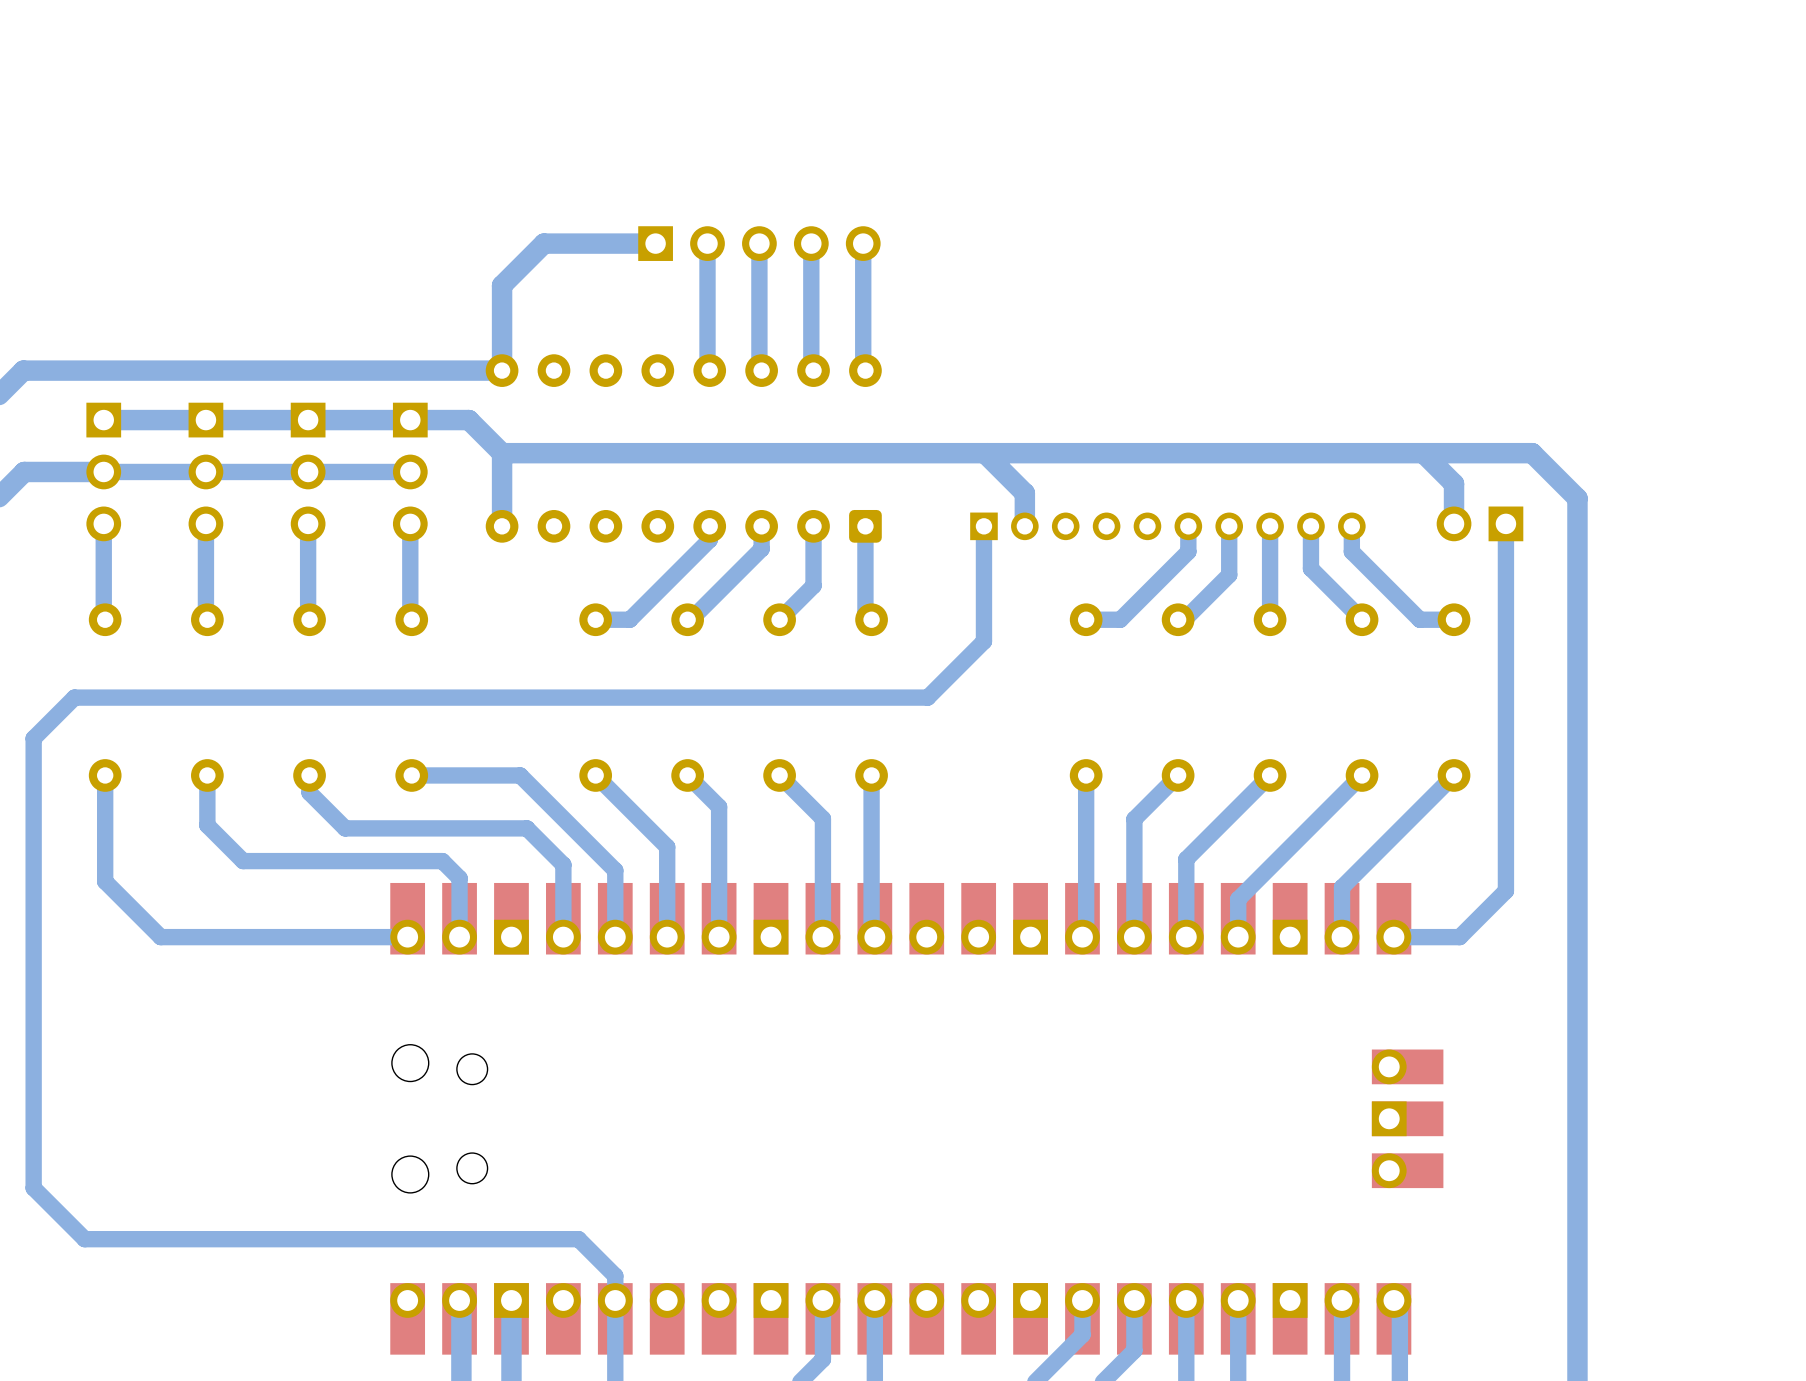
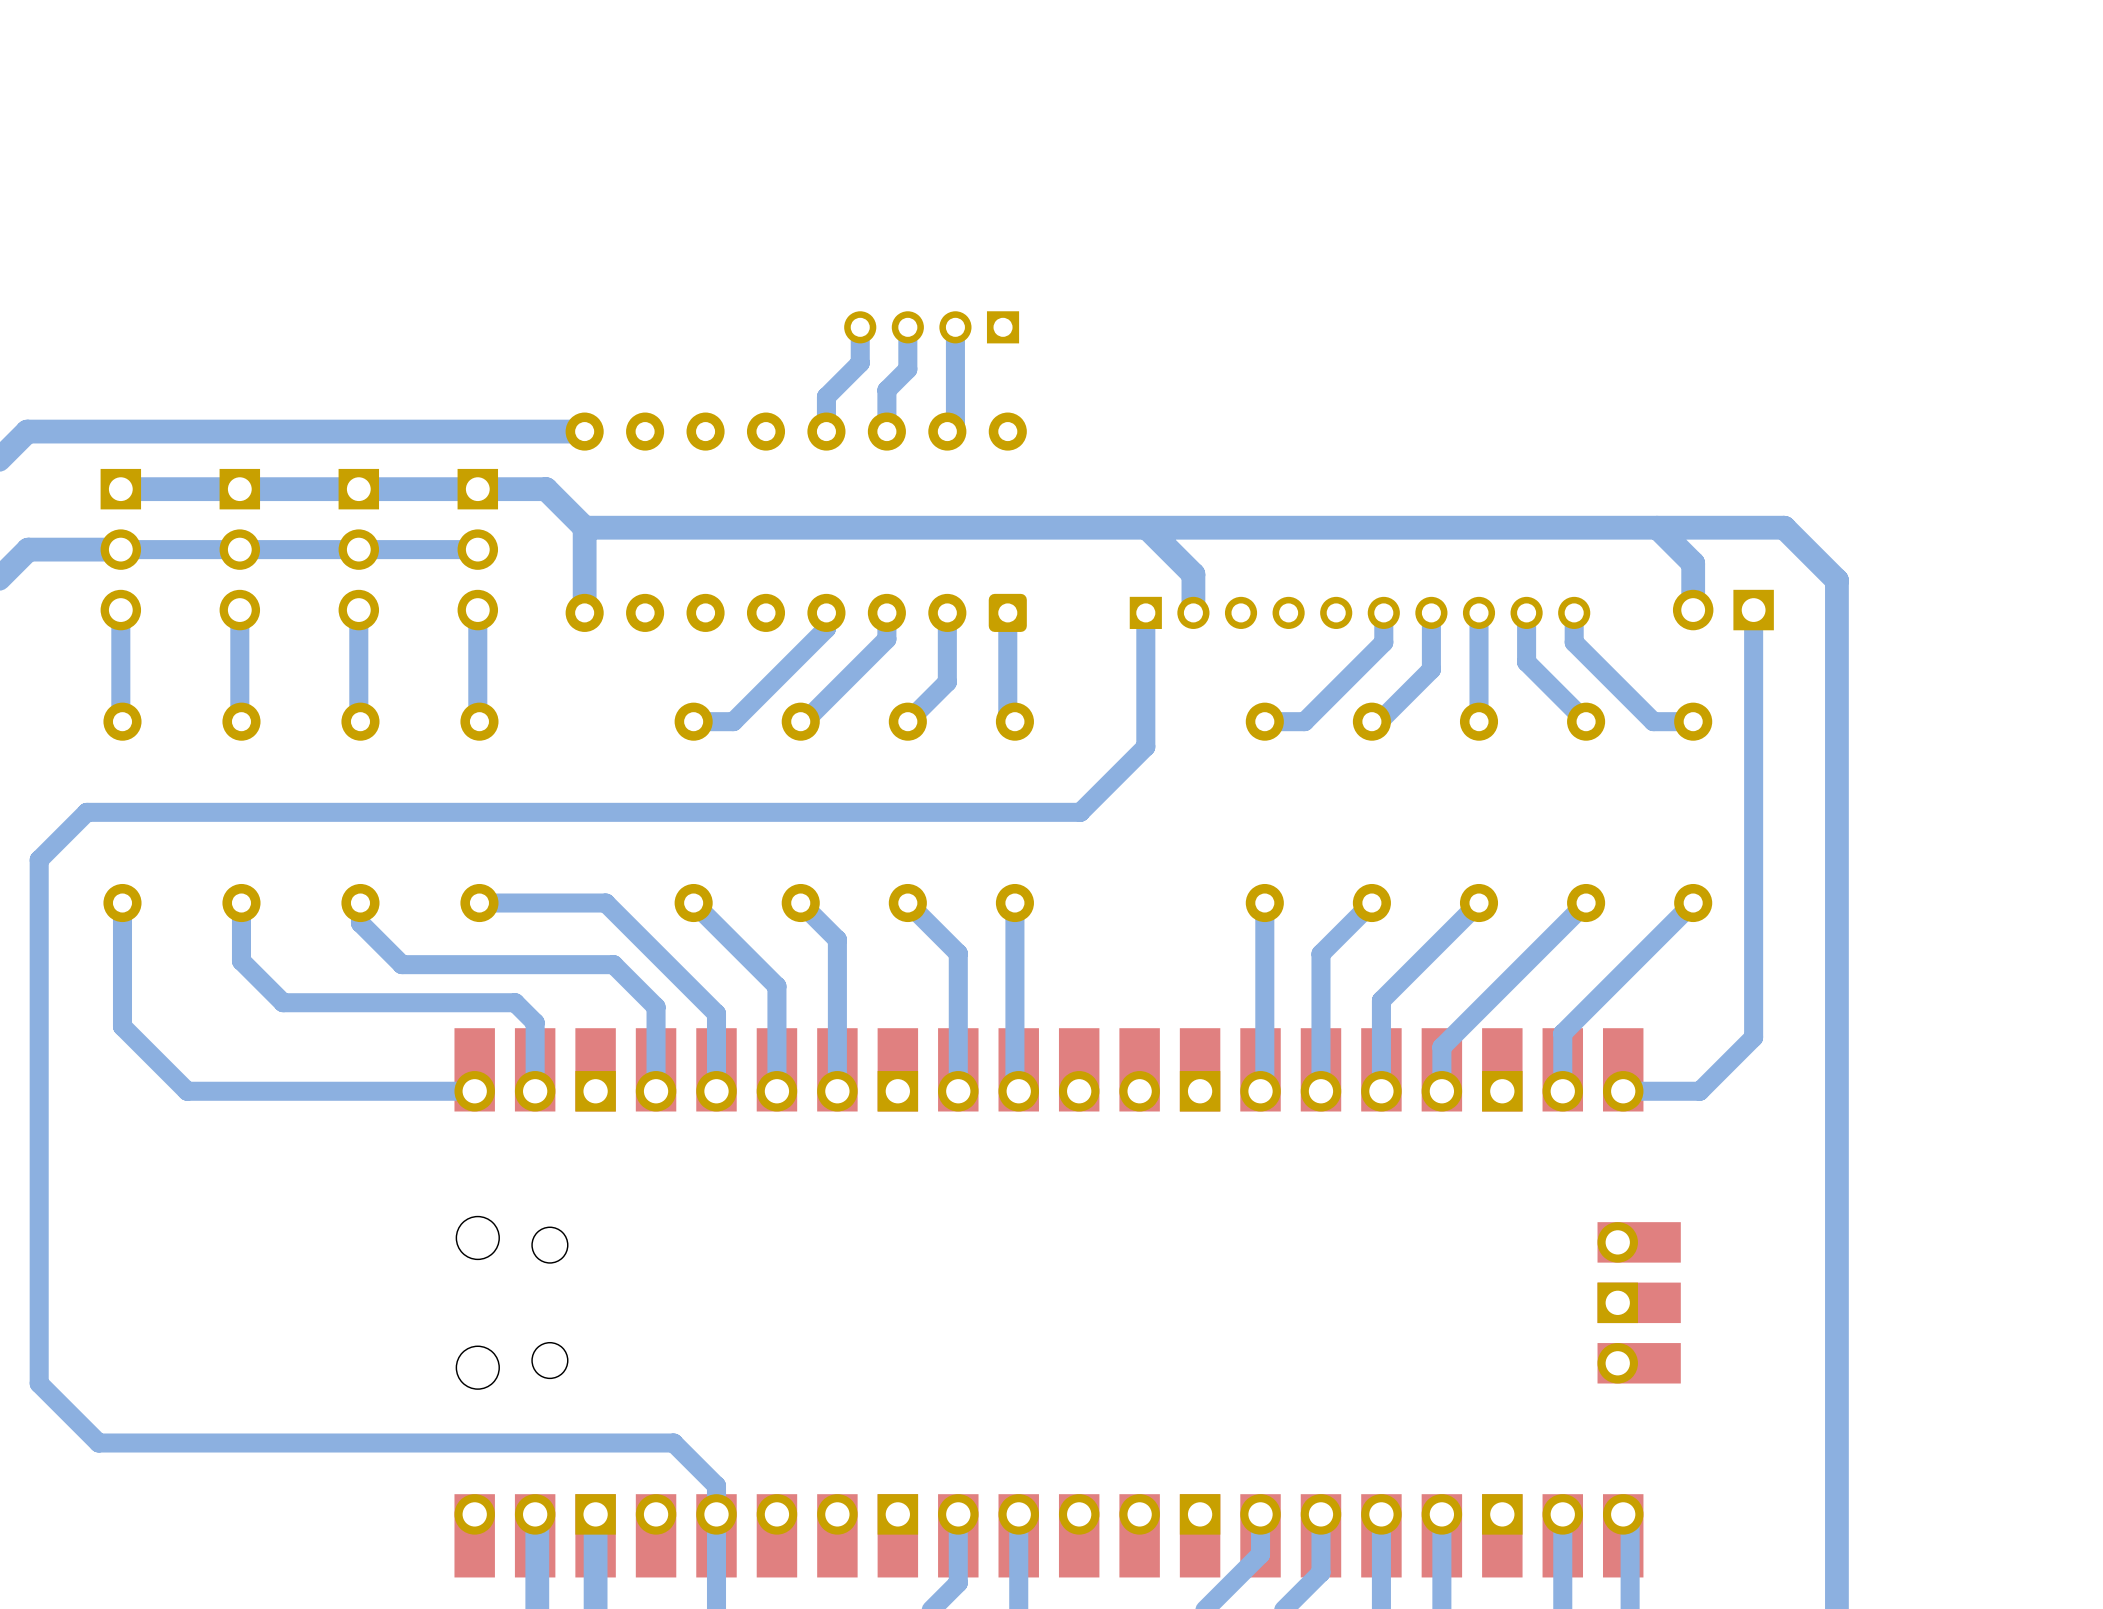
bottom track: (655, 243) (543, 243) (502, 285) (502, 370) -> none
bottom track: (707, 243) (707, 368) (709, 370) -> (860, 327) (860, 363) (826, 396) (826, 431)
bottom track: (759, 243) (759, 368) (761, 370) -> (907, 327) (907, 369) (886, 390) (886, 431)
part: (759, 243) -> none
bottom track: (811, 243) (811, 368) (813, 370) -> (955, 327) (955, 423) (947, 431)
bottom track: (863, 243) (863, 368) -> none
part: none -> (931, 327)

